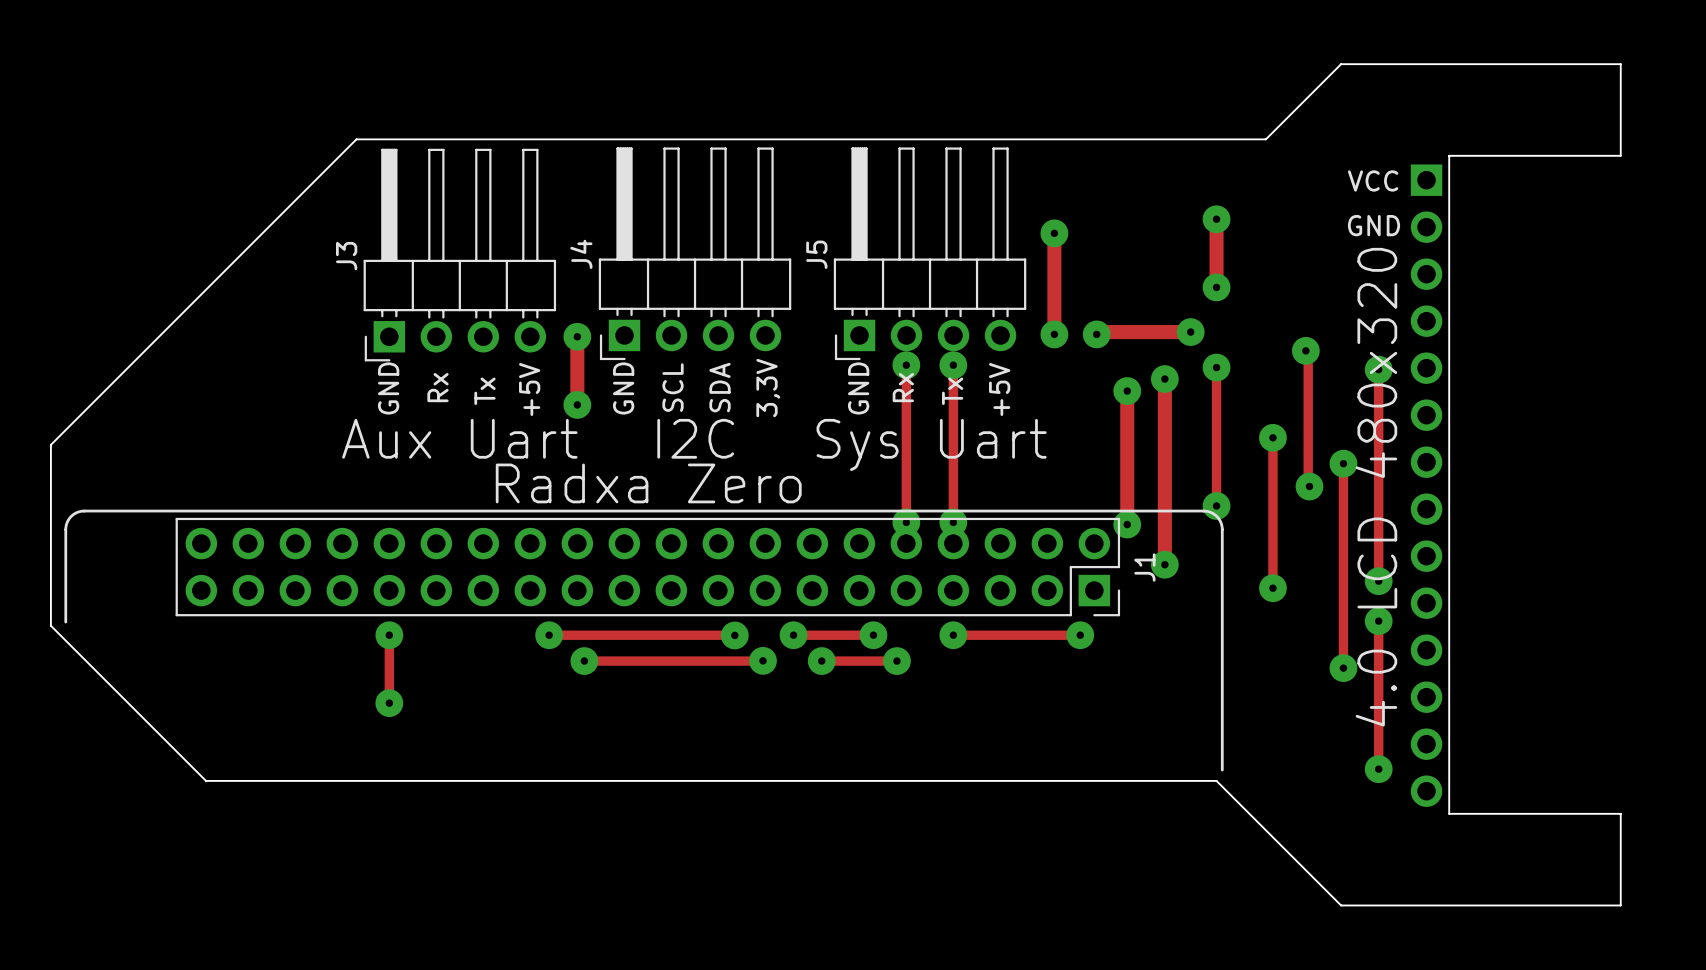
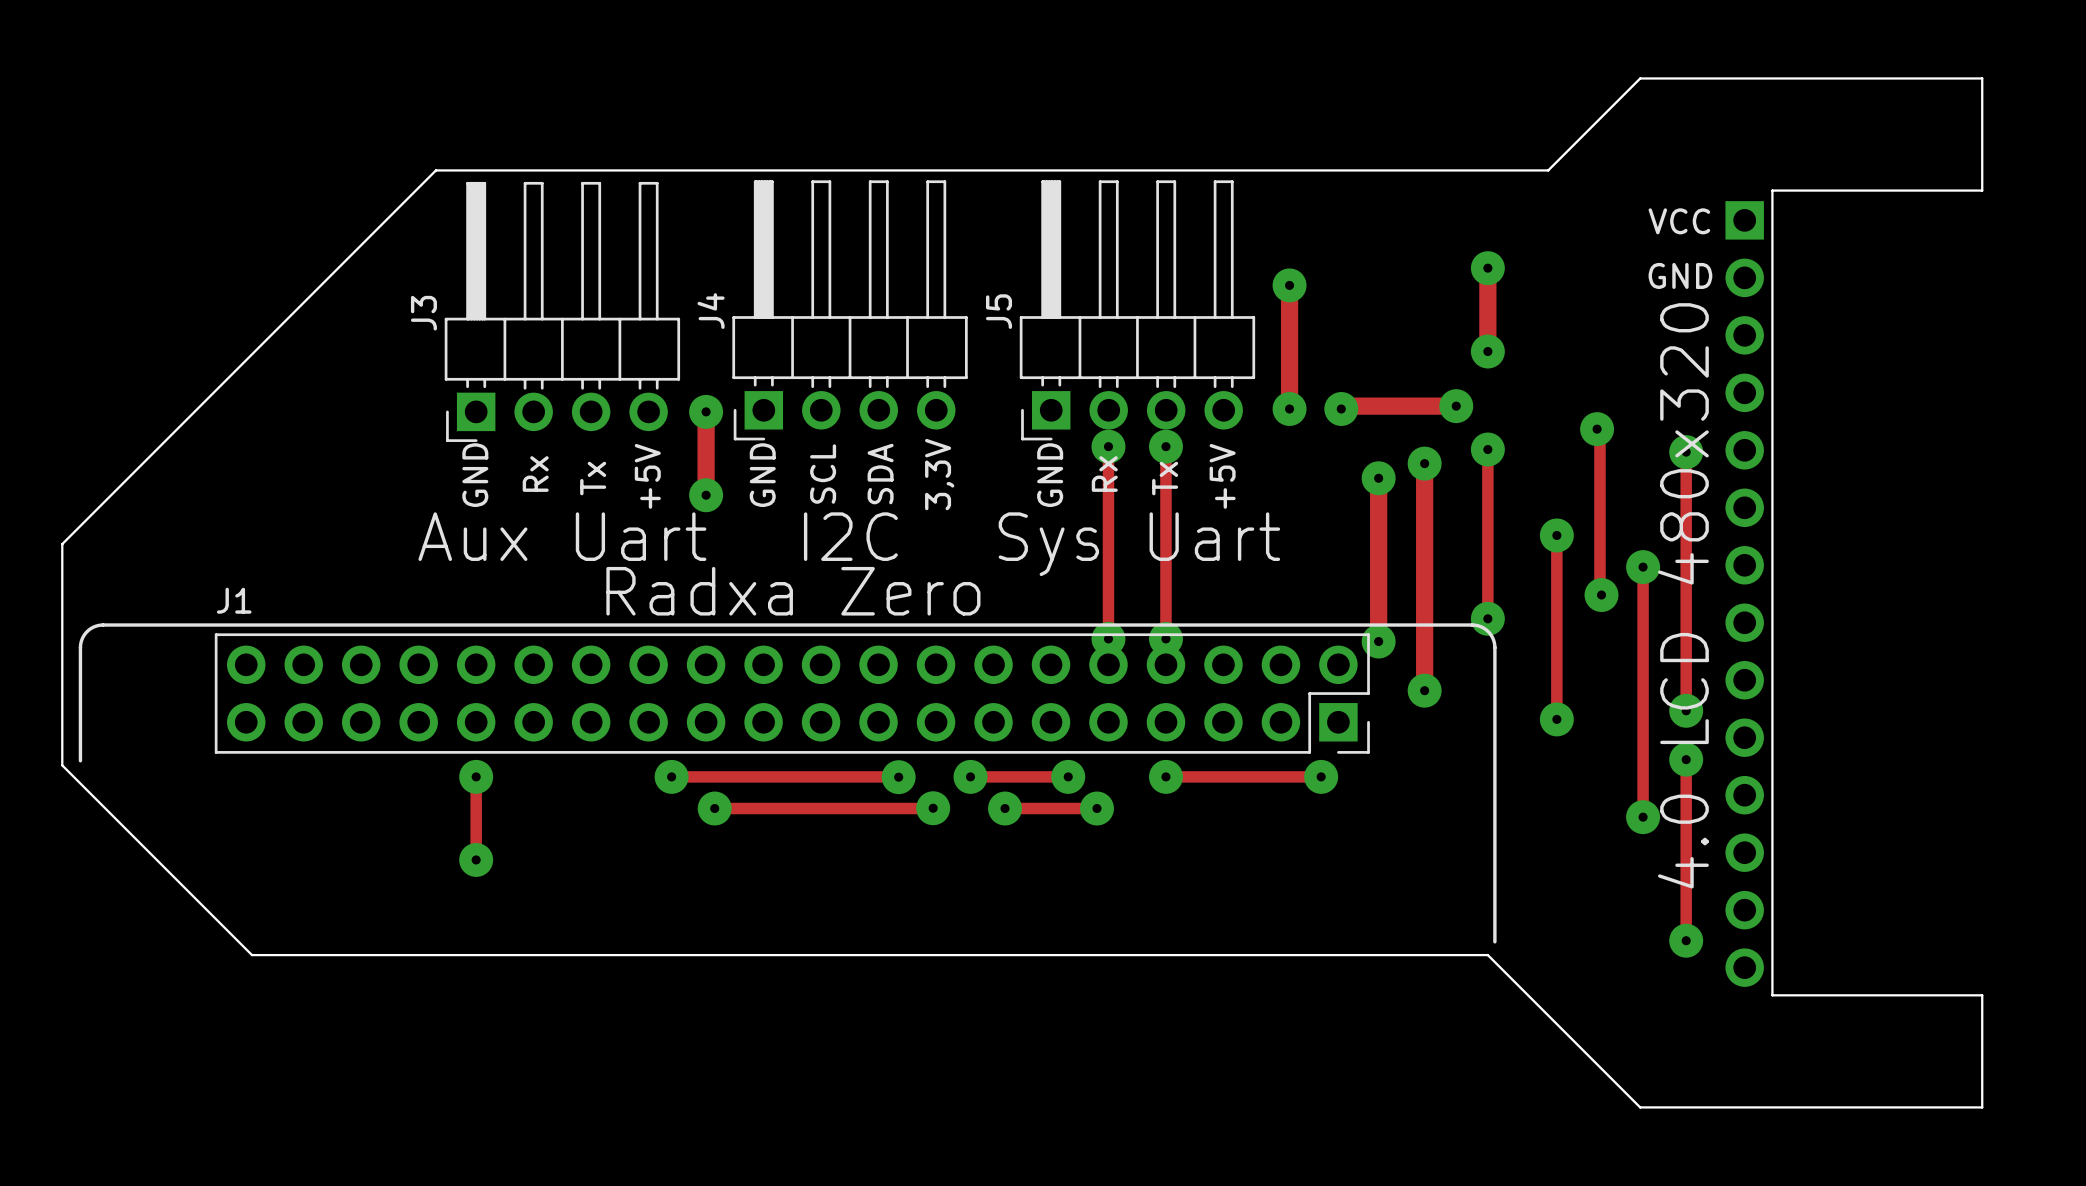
J1 name rotation: 0° (1144, 567) -> 90° clockwise (234, 600)
J1 name position: J1 (1144, 567) -> J1 (234, 600)

